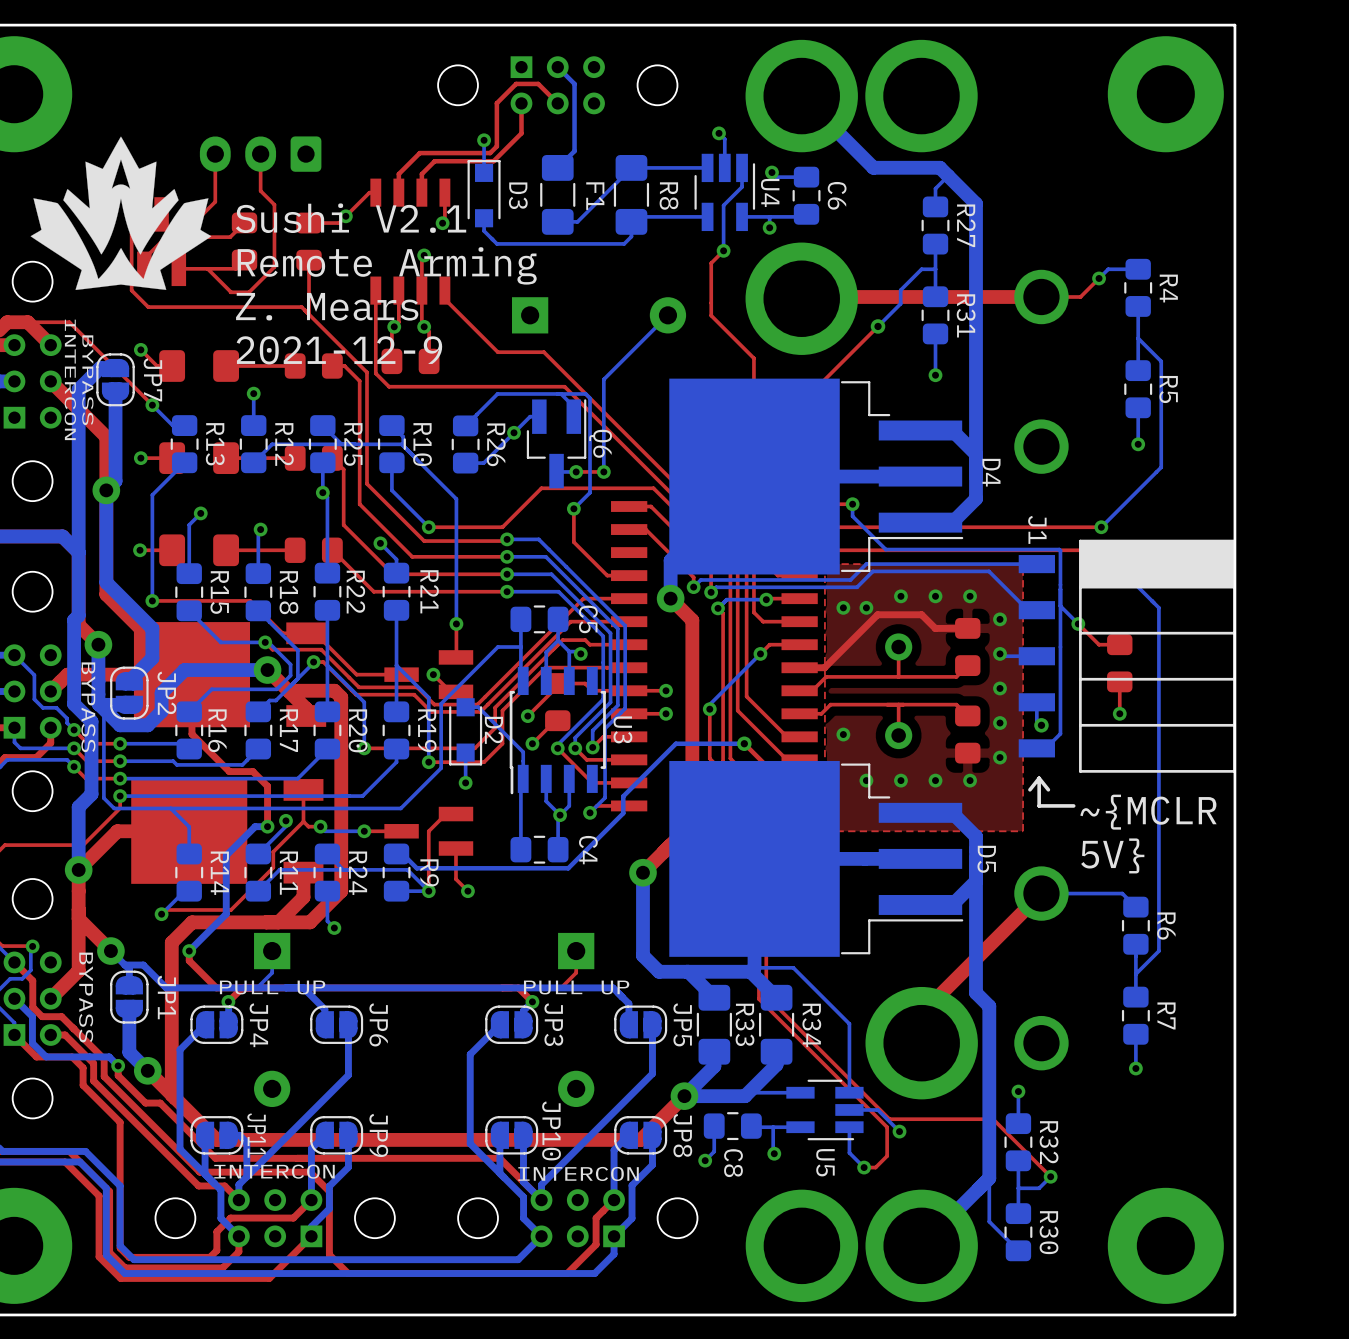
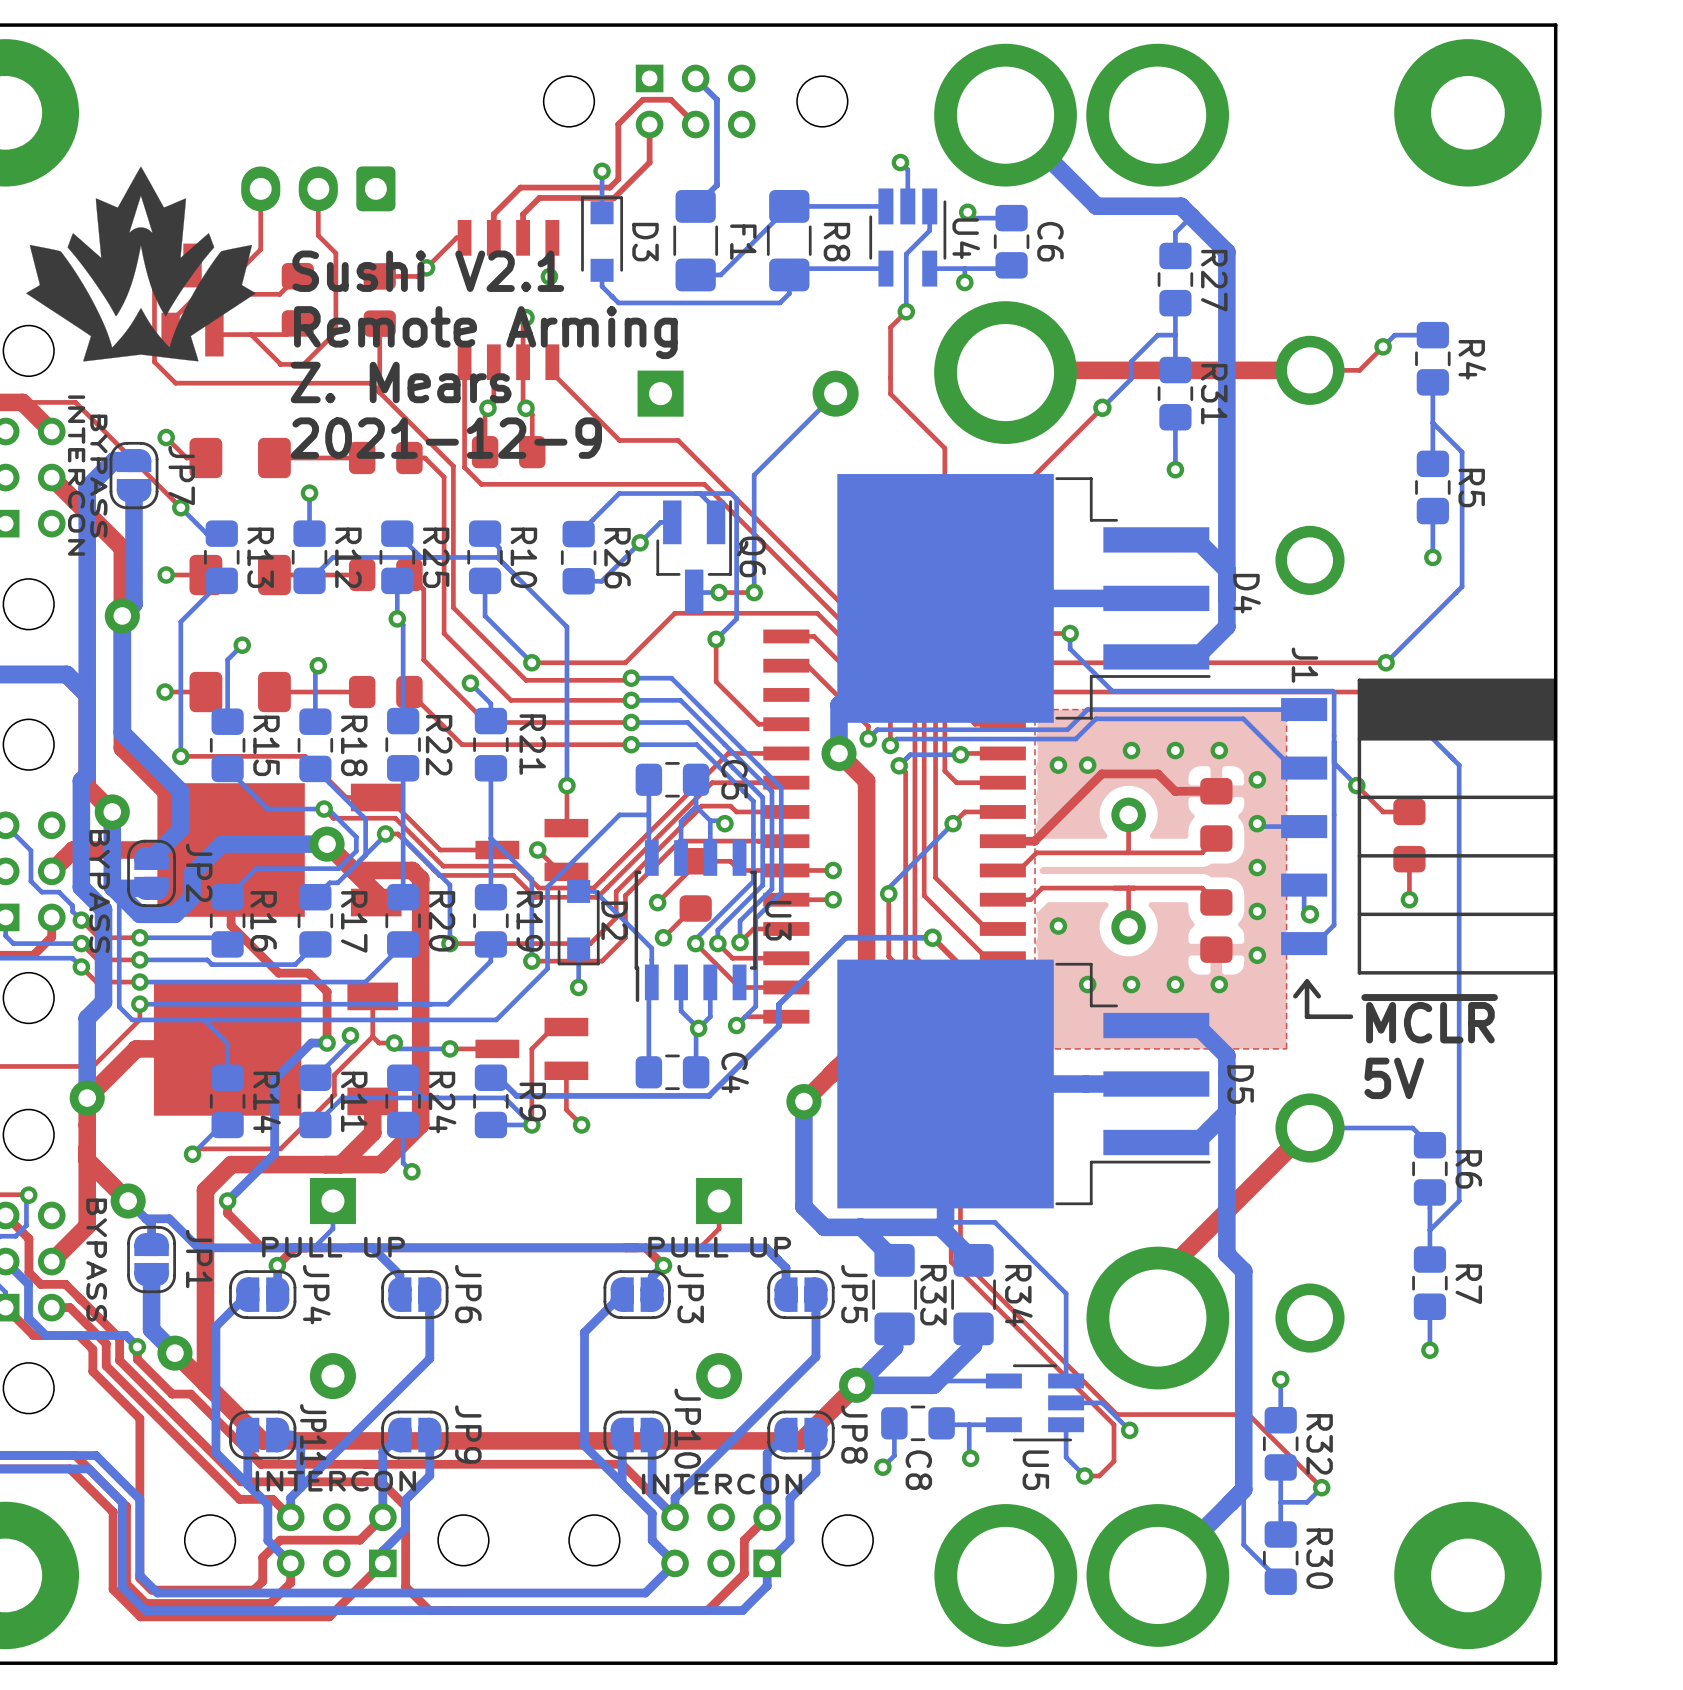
text: ~{MCLR (1148, 812) -> ~{MCLR} (1429, 1018)
text: 5V} (1112, 855) -> 5V (1394, 1078)

